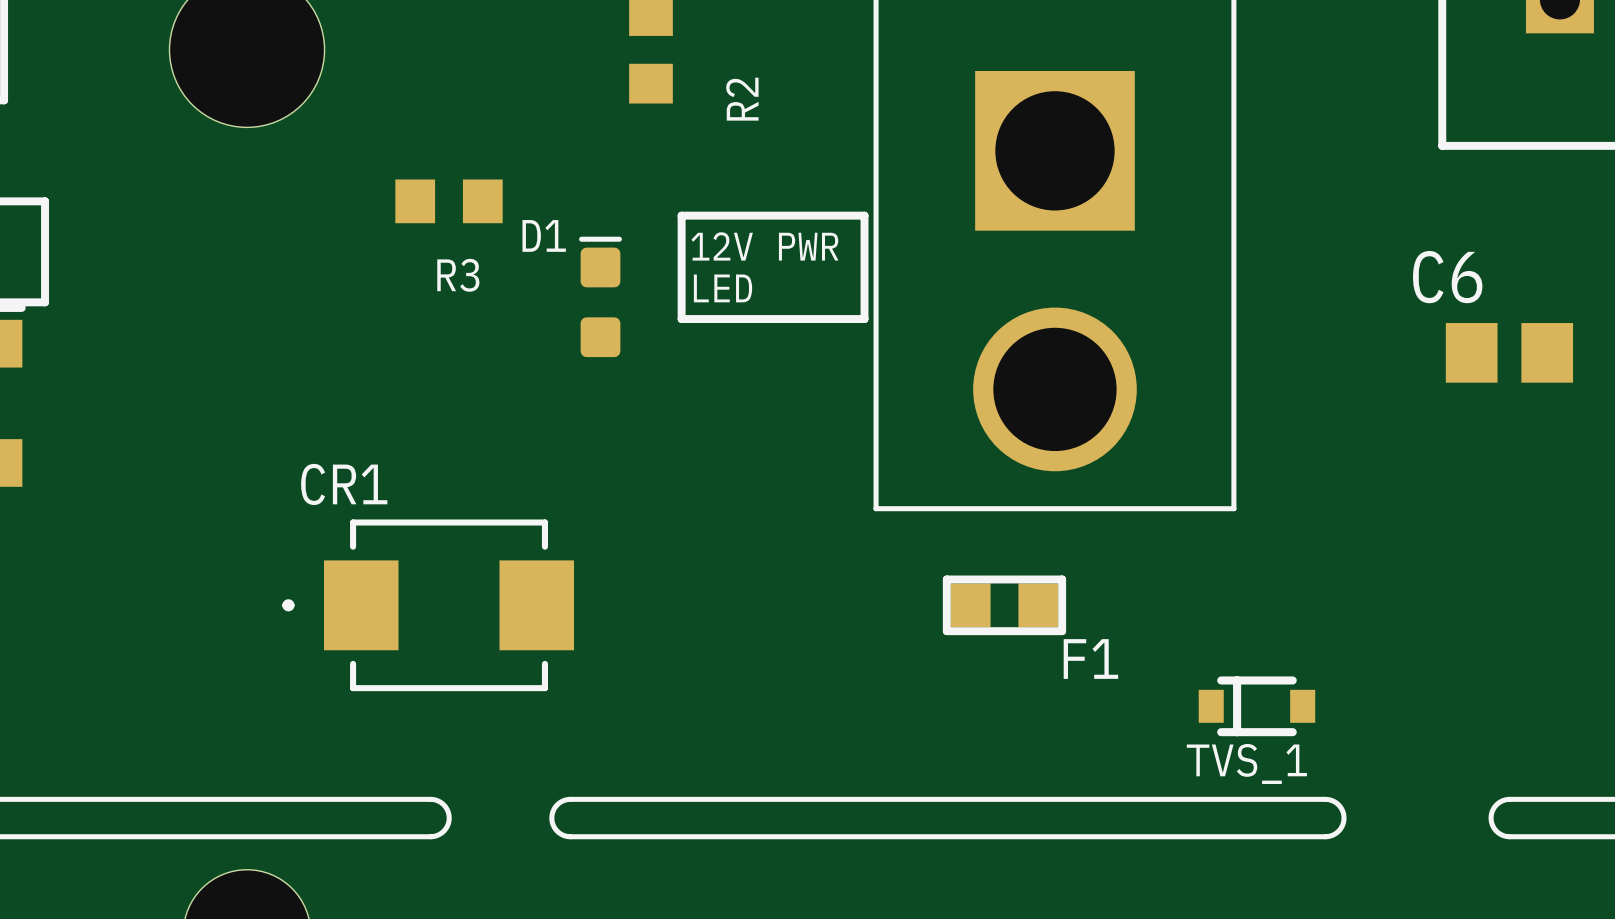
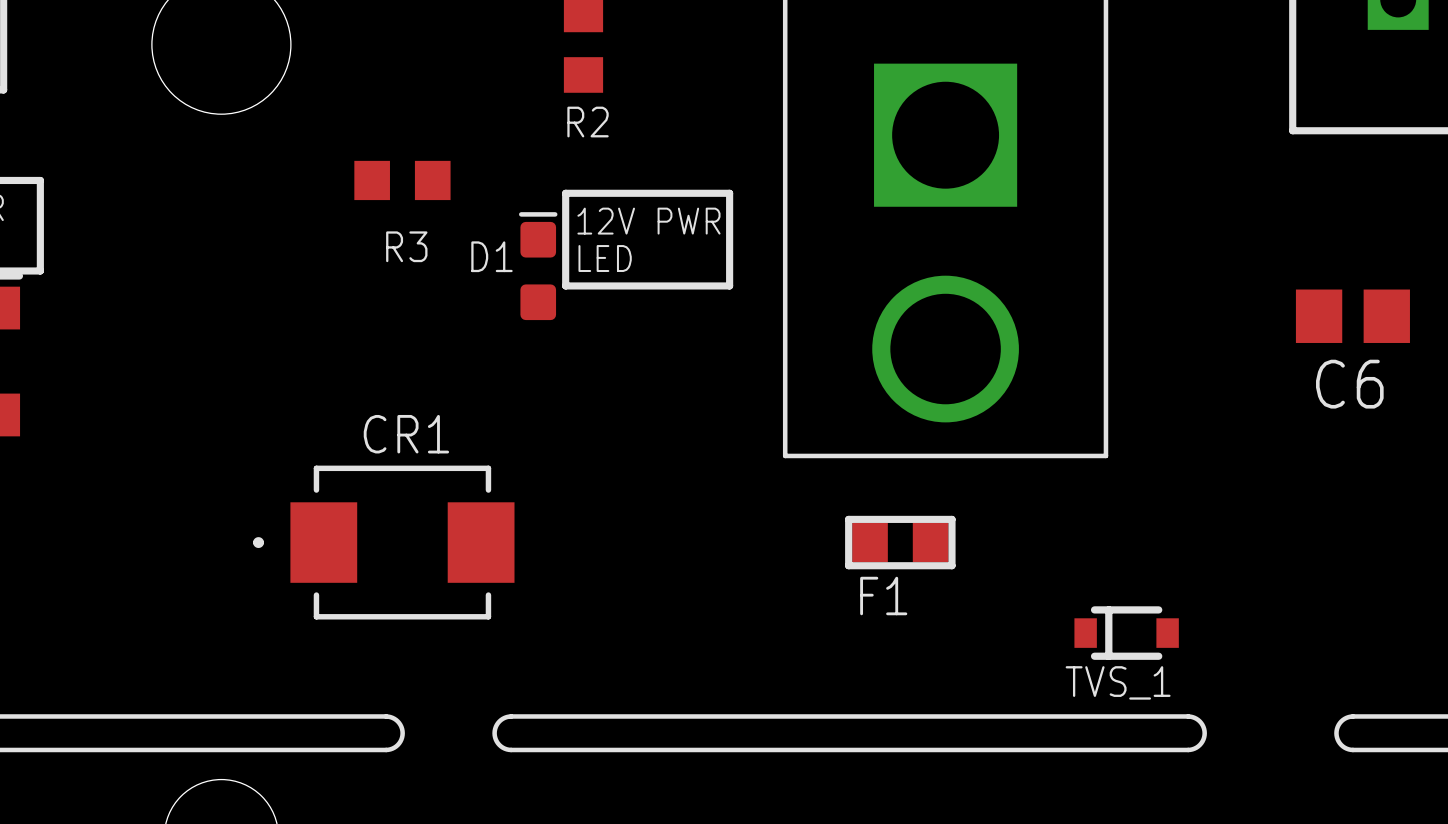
R2 name rotation: 0° (742, 99) -> 90° clockwise (588, 122)
R2 name position: R2 (742, 99) -> R2 (588, 122)
line: (681, 215) (681, 319) -> (610, 193) (565, 193) (565, 285) (610, 285)
line: (814, 215) (864, 215) (864, 319) (814, 319) -> (729, 193) (729, 285)
text position: D1 (544, 235) -> D1 (491, 256)
text position: 12V PWR (764, 246) -> 12V PWR (648, 221)
C6 name position: C6 (1447, 277) -> C6 (1349, 384)
text position: LED (723, 288) -> LED (605, 258)
text position: CR1 (344, 484) -> CR1 (406, 434)
F1 name position: F1 (1090, 659) -> F1 (883, 596)

